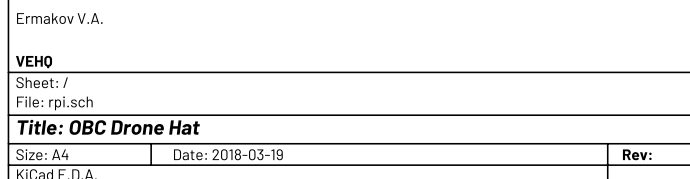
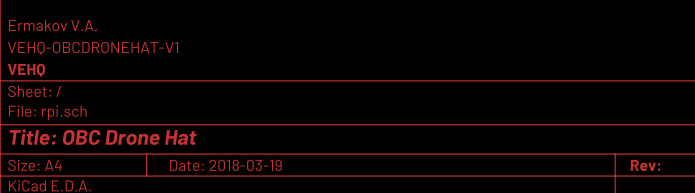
title block: none -> VEHQ-OBCDRONEHAT-V1 (93, 48)

